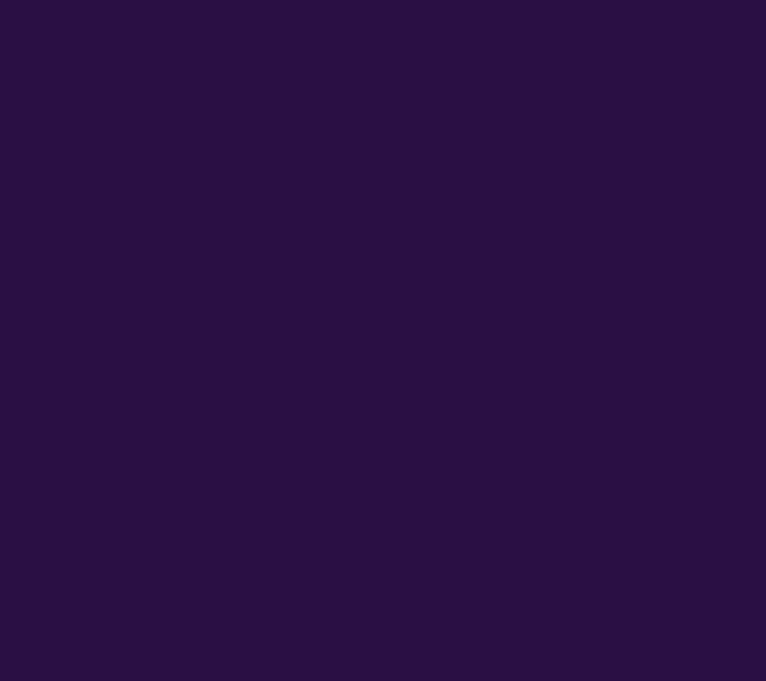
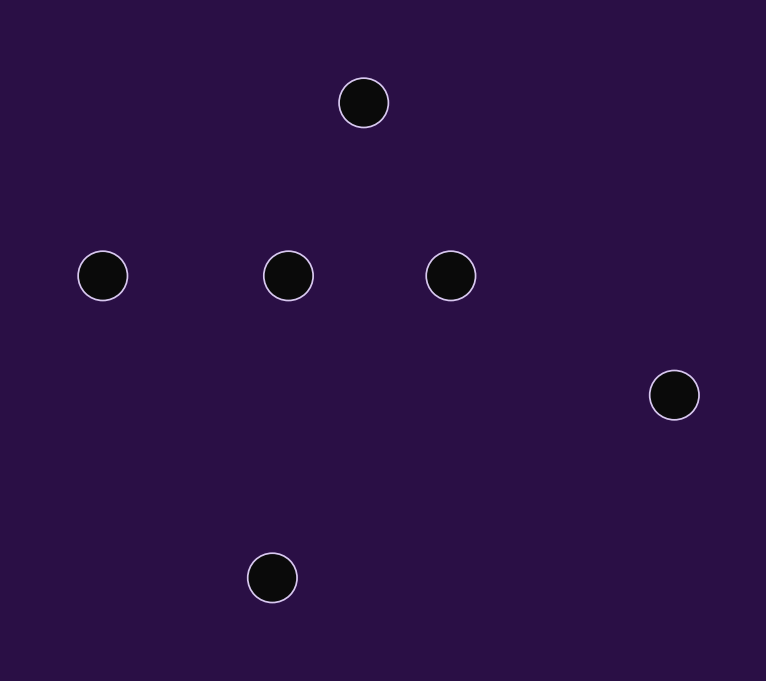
part: none -> (363, 102)
part: none -> (102, 275)
part: none -> (288, 275)
part: none -> (450, 275)
part: none -> (674, 395)
part: none -> (272, 577)

